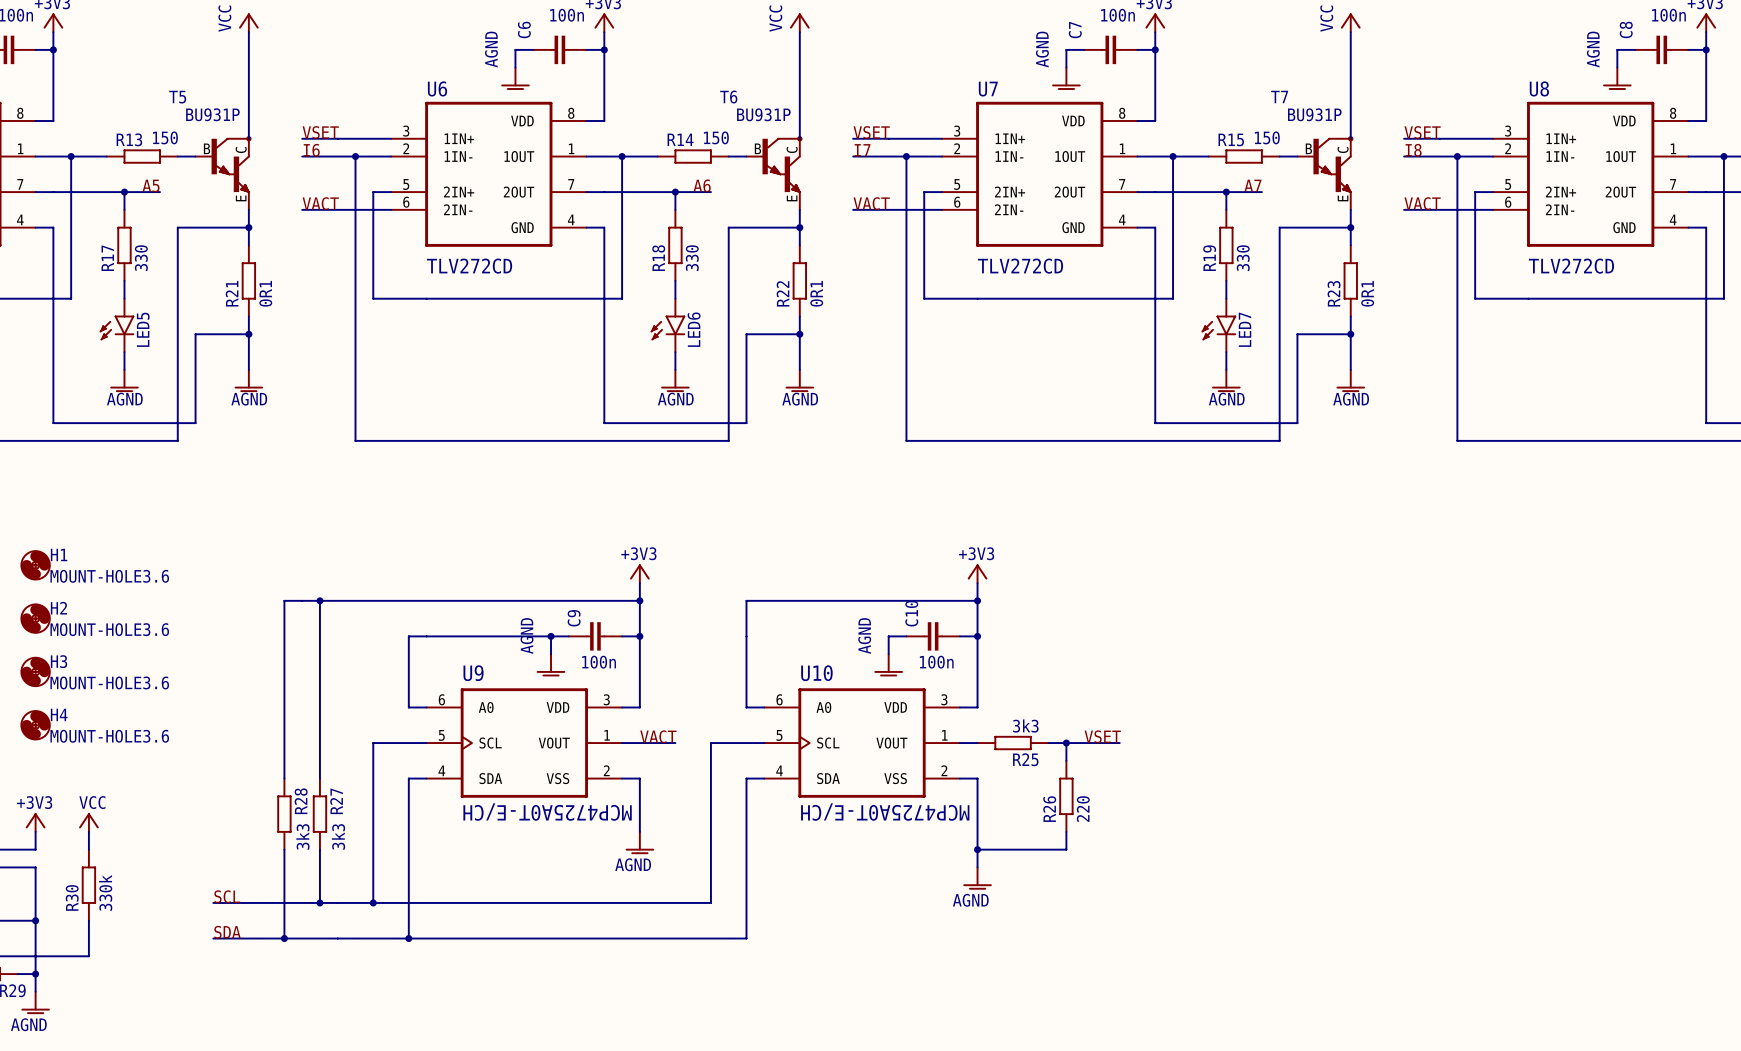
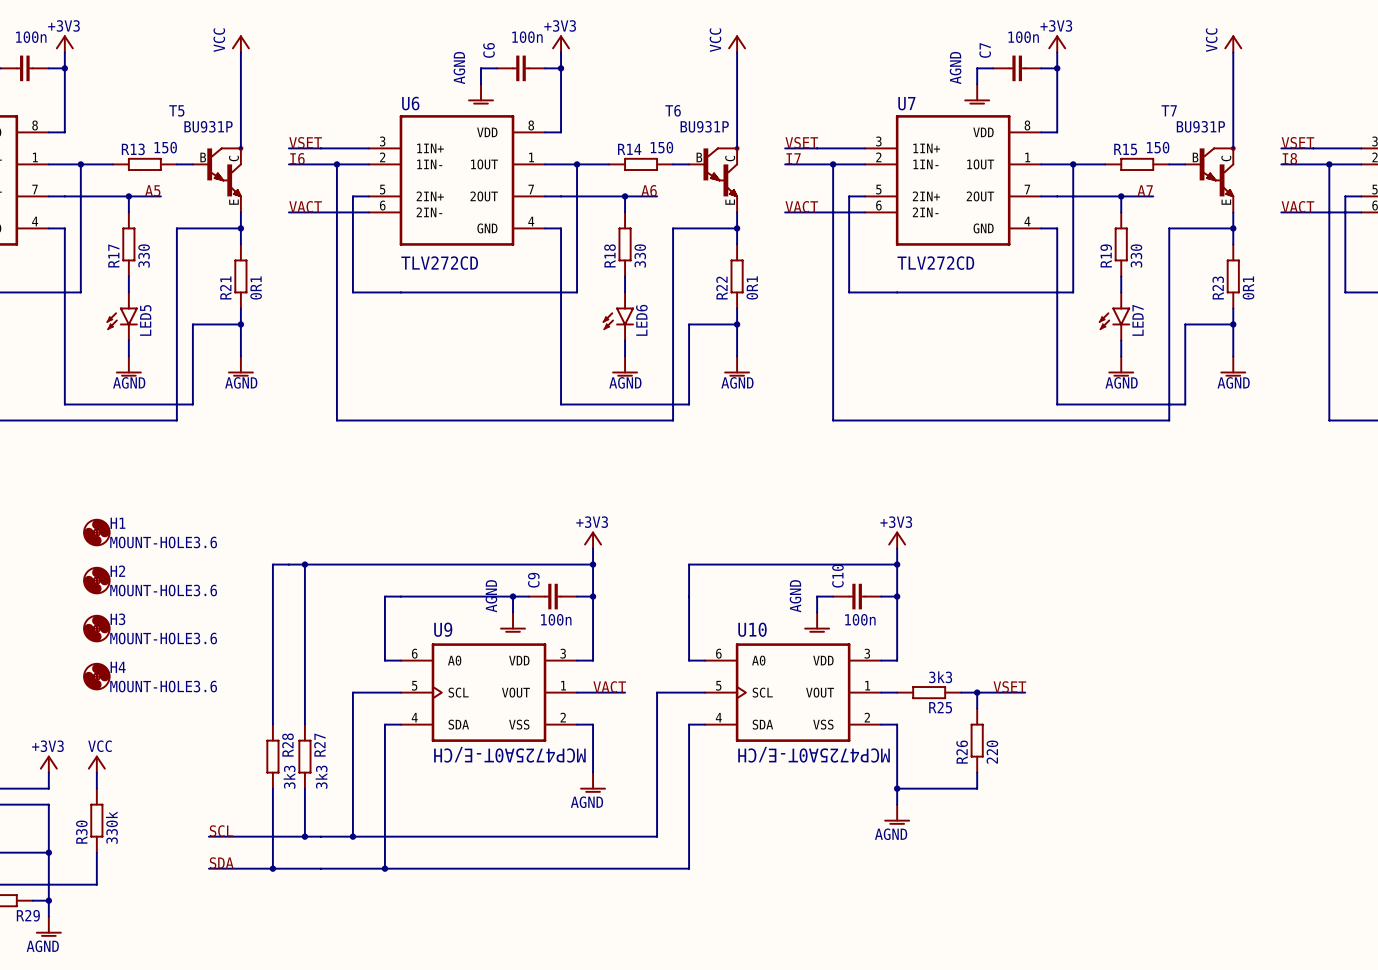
H1 position: (35, 565) -> (96, 532)
H2 position: (35, 618) -> (96, 580)
H3 position: (35, 671) -> (96, 628)
H4 position: (35, 725) -> (96, 676)

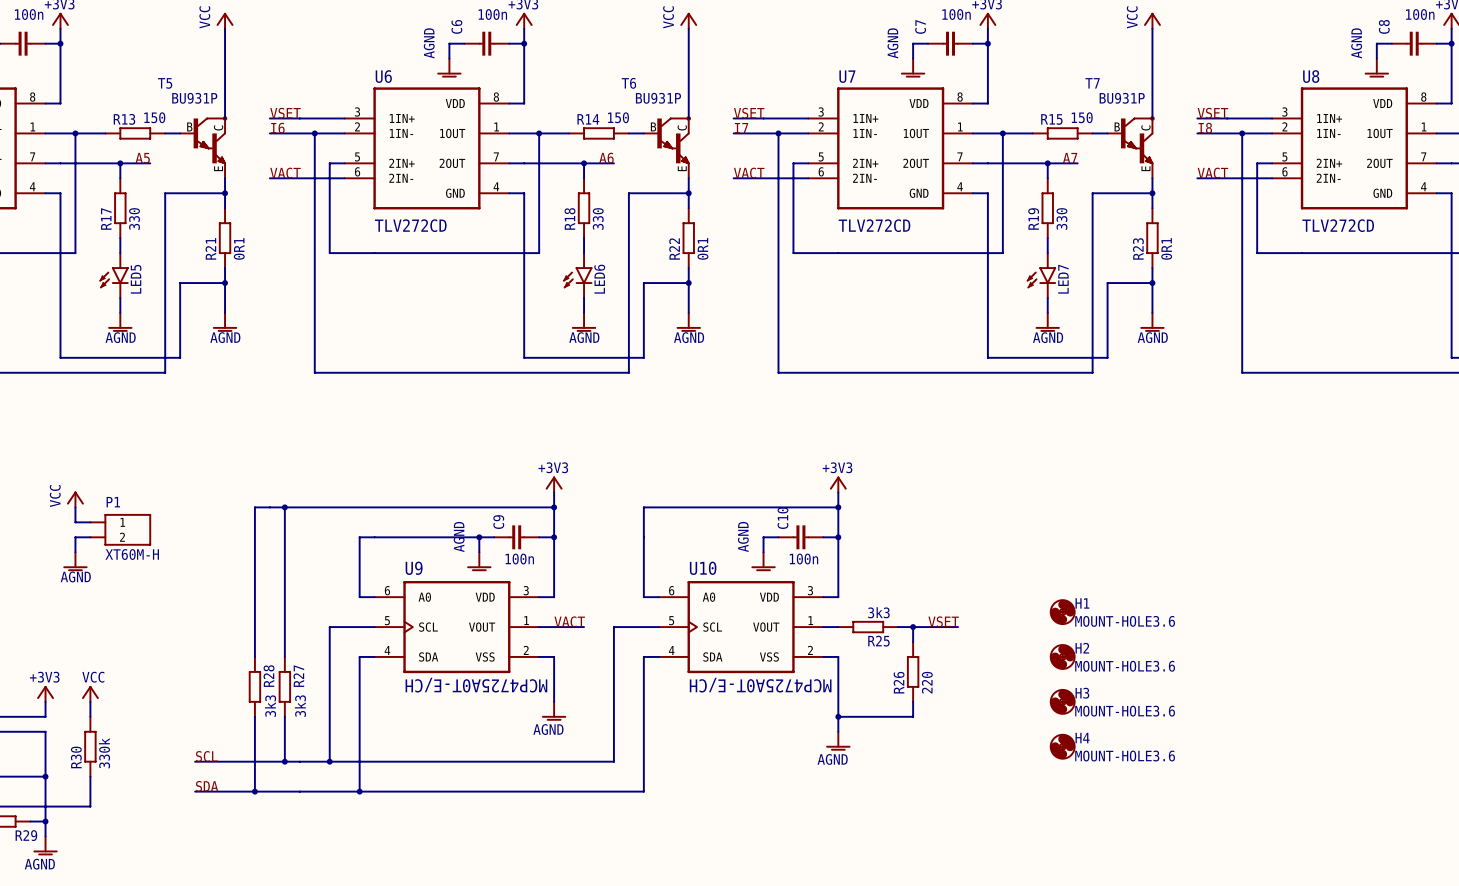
H1 position: (96, 532) -> (1062, 612)
power symbol: none -> VCC (75, 499)
wire: none -> (75, 507) (75, 522) (90, 522)
H2 position: (96, 580) -> (1062, 656)
P1: none -> XT60M-H (120, 529)
wire: none -> (90, 537) (75, 537) (75, 552)
power symbol: none -> AGND (75, 561)
H3 position: (96, 628) -> (1062, 701)
H4 position: (96, 676) -> (1062, 746)

